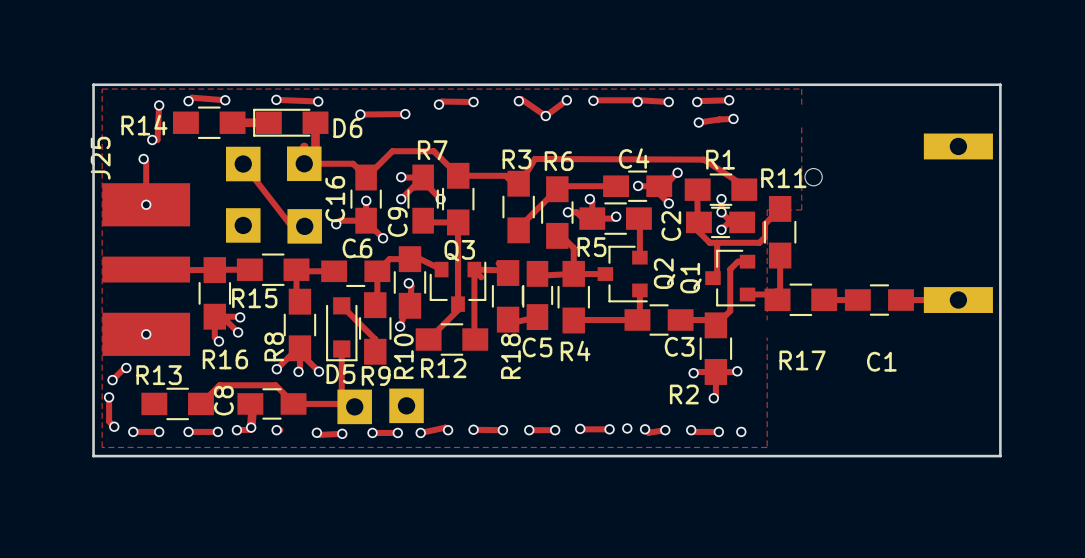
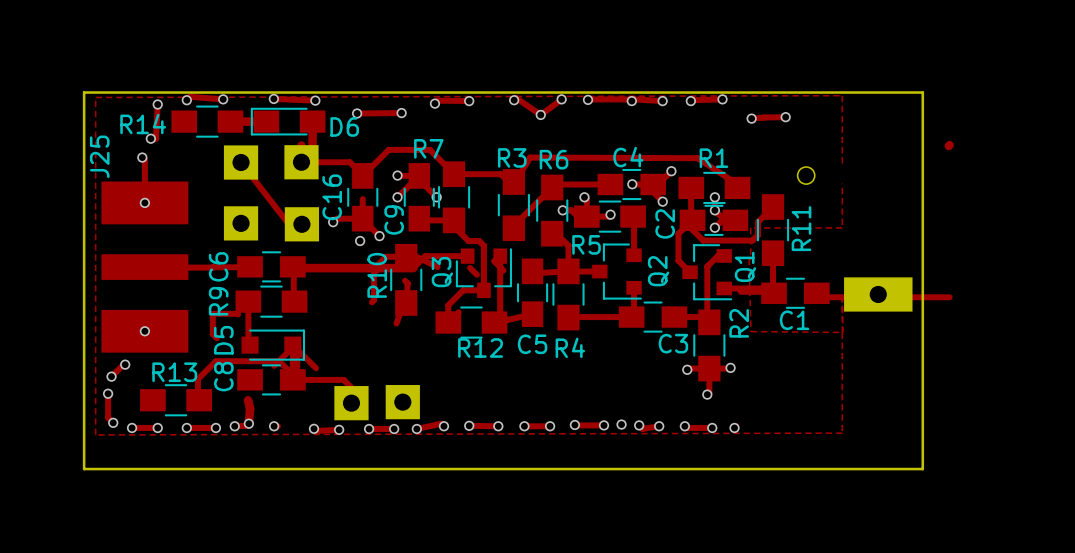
board edge: (93, 84) (93, 456) (1000, 456) (1000, 84) (93, 84) -> (84, 92) (84, 469) (922, 469) (922, 92) (84, 92)
zone outline: (102, 89) (801, 89) (801, 209) (767, 209) (767, 447) (102, 447) (102, 89) -> (842, 95) (95, 97) (95, 434) (842, 433) (842, 296) (843, 332) (750, 331) (749, 258) (750, 259) (750, 227) (842, 227) (842, 95)
track: (733, 118) (698, 122) -> none
via position: (733, 118) -> (751, 118)
track: none -> (785, 117) (751, 118)
via: none -> (785, 117)
via: (698, 122) -> none
part: (958, 146) -> none
R11 name rotation: 0° (783, 178) -> 90° counterclockwise (801, 228)
via: (366, 200) -> none
track: (458, 222) (458, 310) (428, 339) -> none
track: none -> (692, 220) (678, 233) (678, 260) (690, 272)
track: none -> (454, 226) (468, 241) (479, 241) (483, 245) (483, 290) (463, 290) (448, 305) (448, 322) (458, 312)
track: (717, 242) (717, 273) (712, 278) -> none
via: none -> (360, 240)
C6 name rotation: 0° (357, 248) -> 90° counterclockwise (218, 266)
C6 name position: C6 (357, 248) -> C6 (218, 266)
Q3 name rotation: 0° (459, 250) -> 90° counterclockwise (442, 272)
track: none -> (467, 256) (425, 256) (413, 268) (292, 266)
track: none -> (500, 256) (500, 316) (494, 322) (492, 320)
track: none -> (724, 255) (717, 255) (707, 266) (707, 320)
track: (747, 261) (737, 261) (730, 269) (730, 310) (715, 325) -> none
R15: (273, 269) -> none
track: (505, 270) (474, 269) (475, 339) -> none
C6 position: (355, 271) -> (271, 266)
Q1 name position: Q1 (690, 278) -> Q1 (745, 266)
Q1 position: (730, 278) -> (707, 272)
via: (408, 283) -> none
Q3 position: (458, 286) -> (483, 273)
track: none -> (724, 288) (769, 288)
R16: (214, 293) -> none
R18: (508, 296) -> none
part: none -> (878, 294)
R17: (800, 299) -> none
C1 position: (879, 300) -> (795, 293)
part: (958, 300) -> none
track: none -> (248, 301) (248, 343) (250, 345)
track: (341, 305) (375, 339) (375, 351) -> none
track: (222, 316) (238, 332) -> none
via: (240, 317) -> none
R8: (299, 325) -> none
via: (400, 326) -> none
R9 rotation: 0° (375, 328) -> 90° clockwise (271, 301)
R9 position: (375, 328) -> (271, 301)
D5 rotation: 0° (341, 329) -> 90° counterclockwise (273, 345)
D5 position: (341, 329) -> (273, 345)
via: (238, 332) -> none
R12 position: (451, 339) -> (471, 322)
via: (218, 341) -> none
track: none -> (292, 345) (292, 379) (343, 379) (352, 388)
track: (341, 349) (341, 393) (354, 406) -> none
R10 name position: R10 (403, 356) -> R10 (377, 275)
C1 name position: C1 (881, 361) -> C1 (794, 320)
R12 name position: R12 (443, 368) -> R12 (480, 347)
via: (276, 369) -> none
via: (298, 371) -> none
via: (318, 371) -> none
D5 name position: D5 (340, 374) -> D5 (223, 340)
R13 name position: R13 (159, 375) -> R13 (174, 372)
track: none -> (292, 374) (279, 361) (215, 361) (197, 379) (197, 395)
R2 name rotation: 0° (684, 394) -> 90° counterclockwise (739, 323)
R2 name position: R2 (684, 394) -> R2 (739, 323)
C8 position: (271, 403) -> (271, 379)
track: (293, 403) (275, 385) (219, 385) (200, 403) -> none
track: (293, 403) (351, 403) -> none

